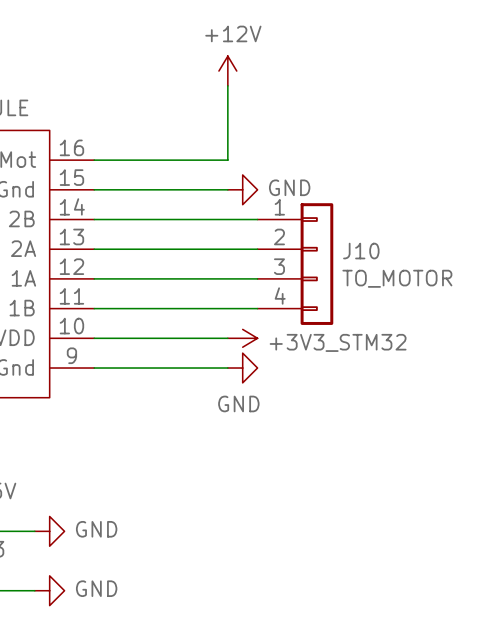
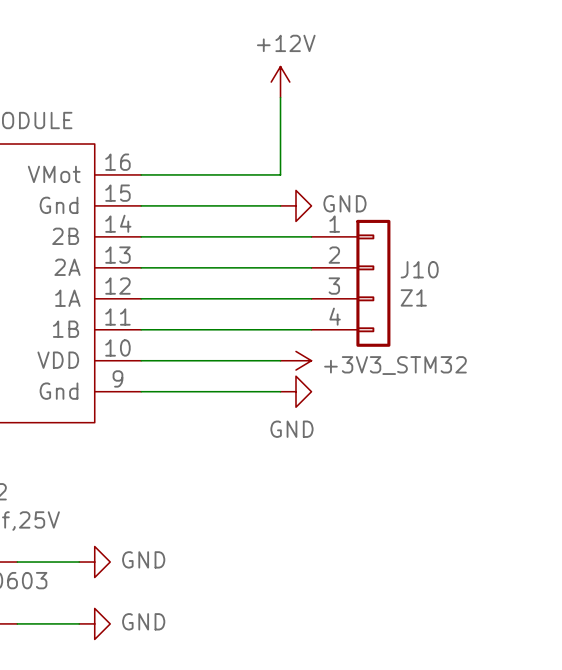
J10 value: TO_MOTOR (397, 278) -> Z1 (413, 297)

